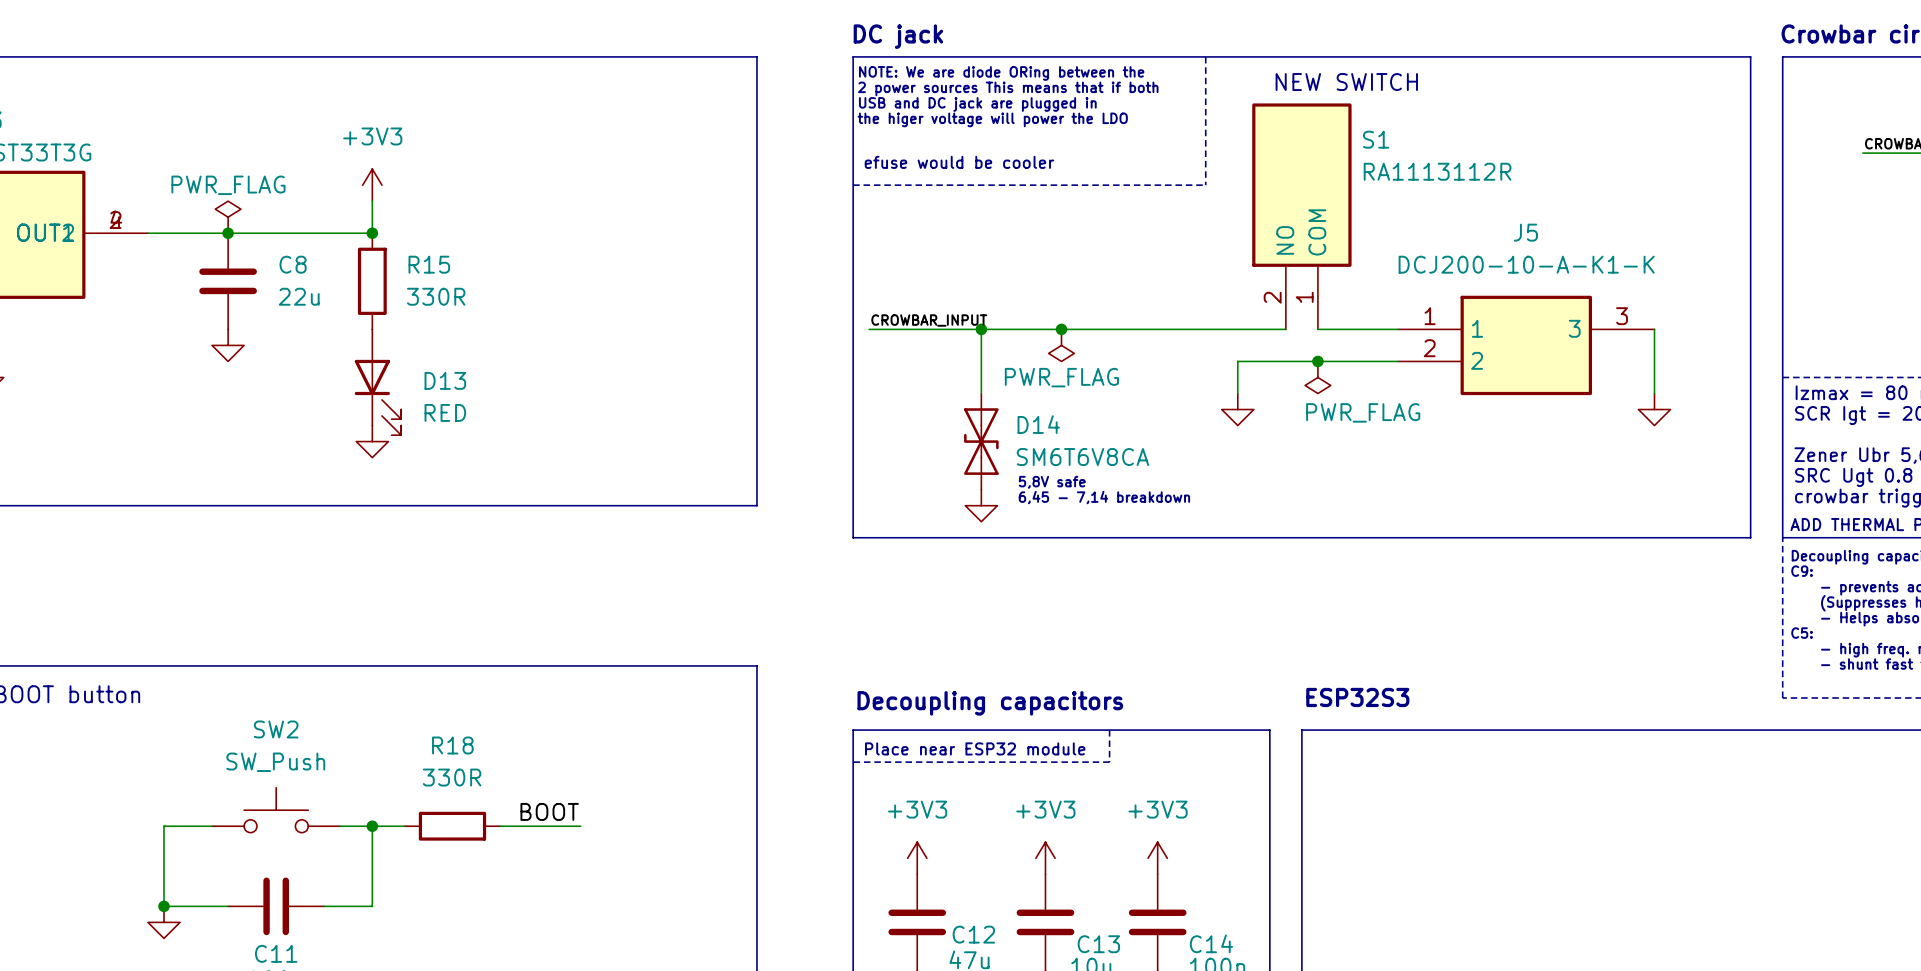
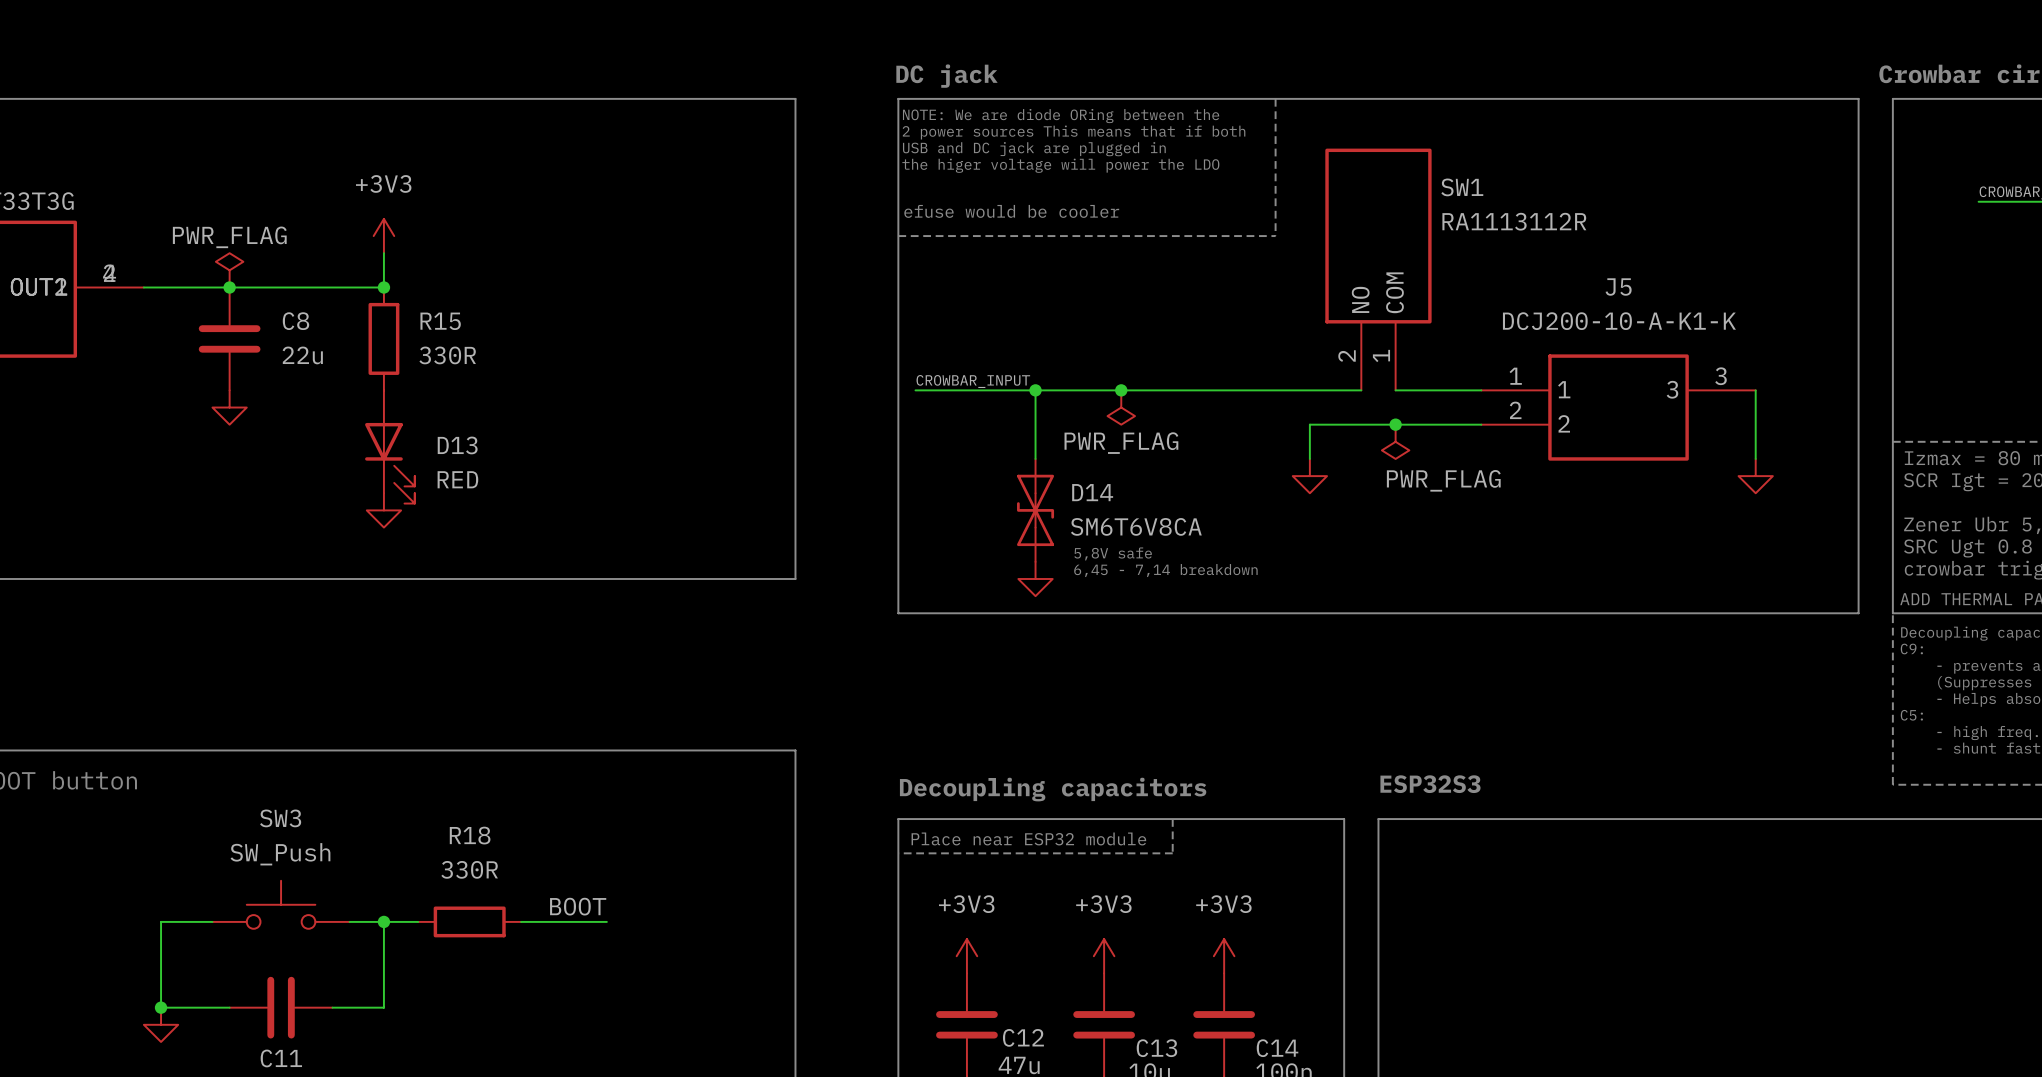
text: NEW SWITCH (1346, 82) -> none
S1 name: S1 (1376, 139) -> SW1 (1462, 187)
SW2 name: SW2 (276, 729) -> SW3 (280, 818)

